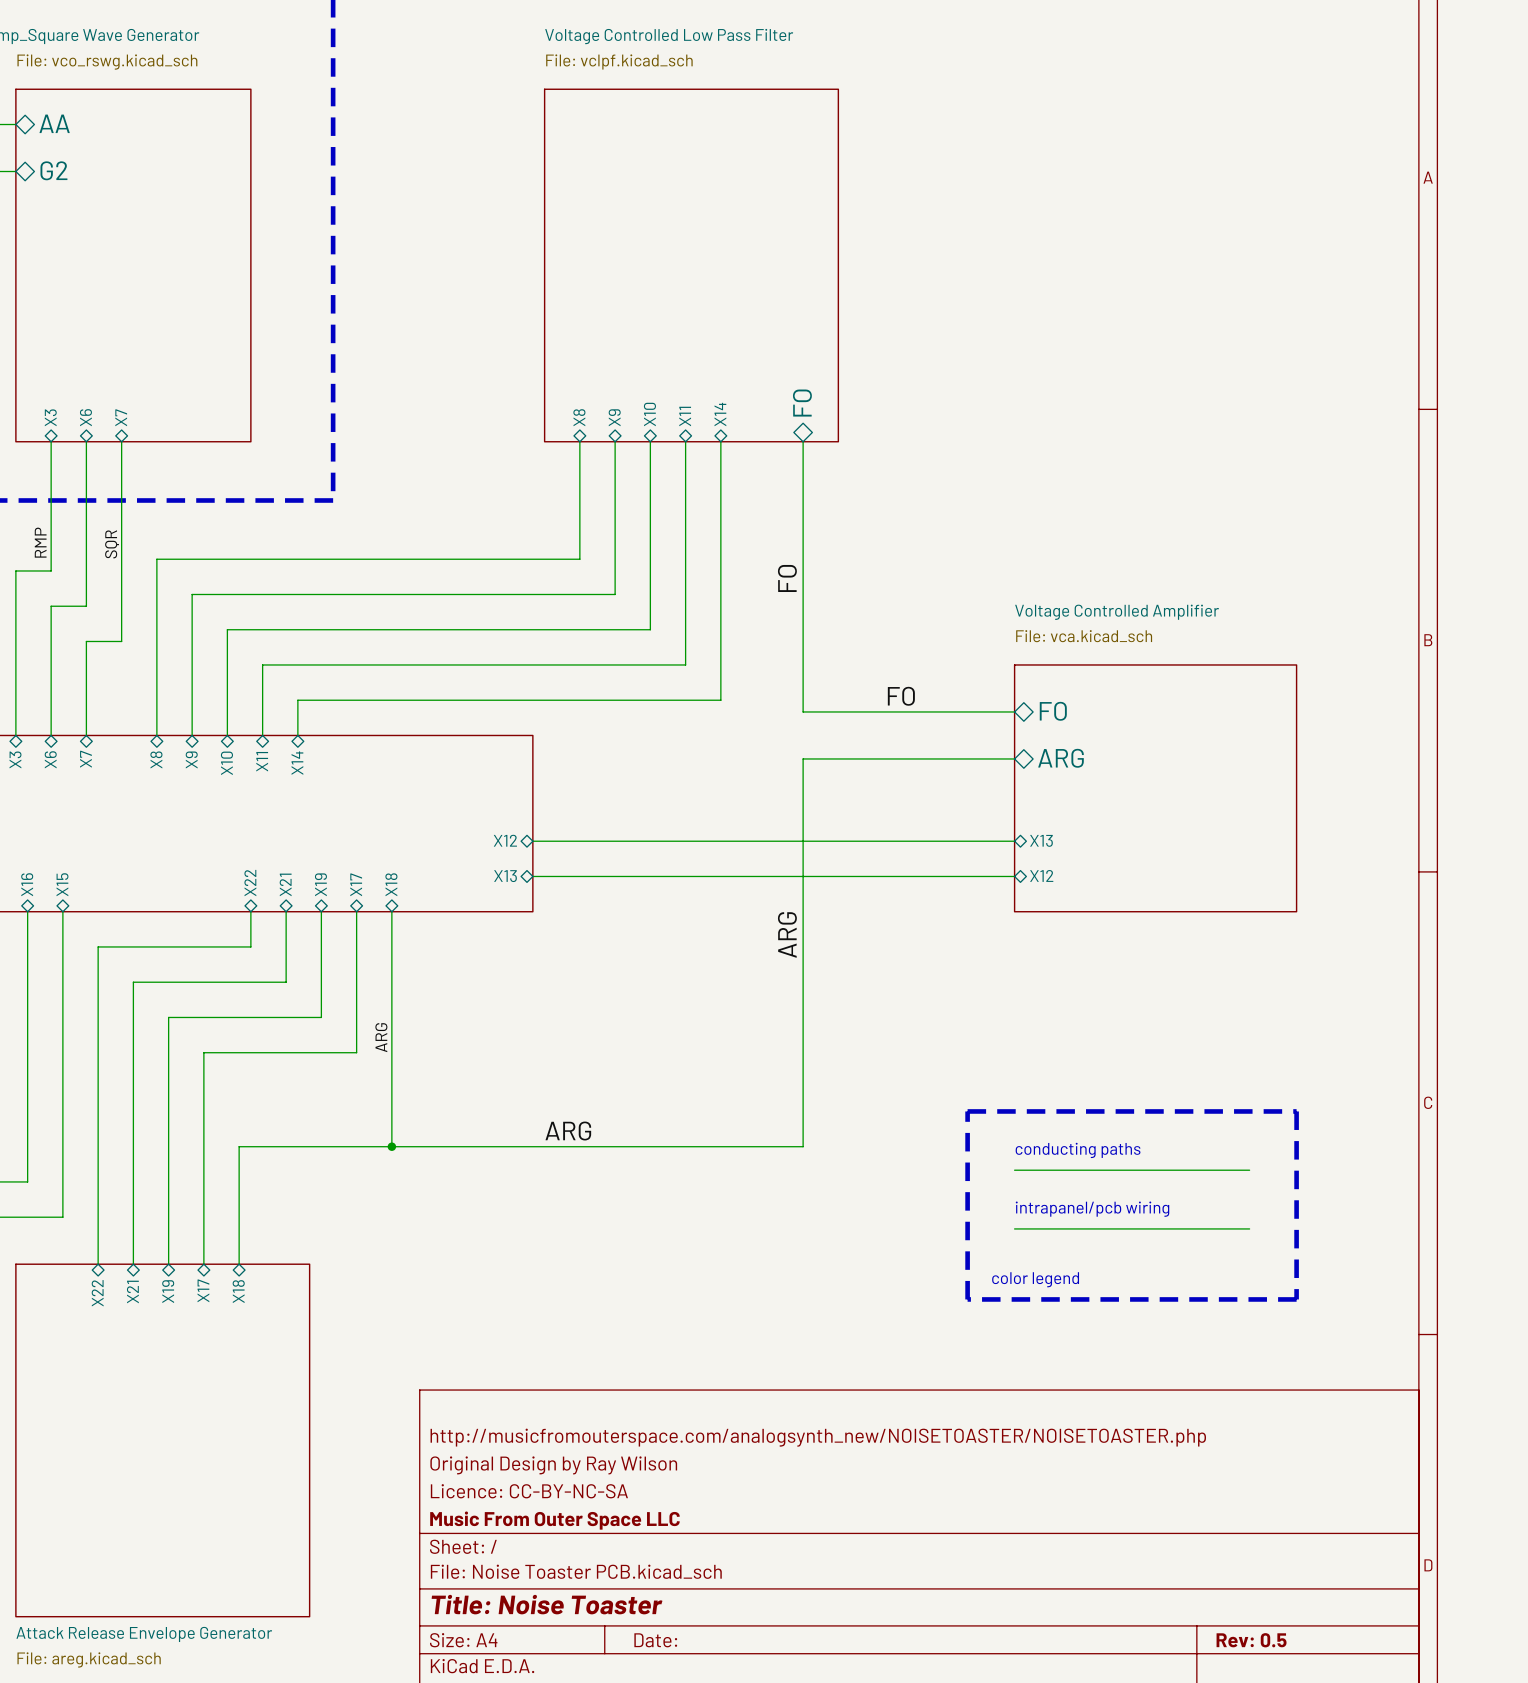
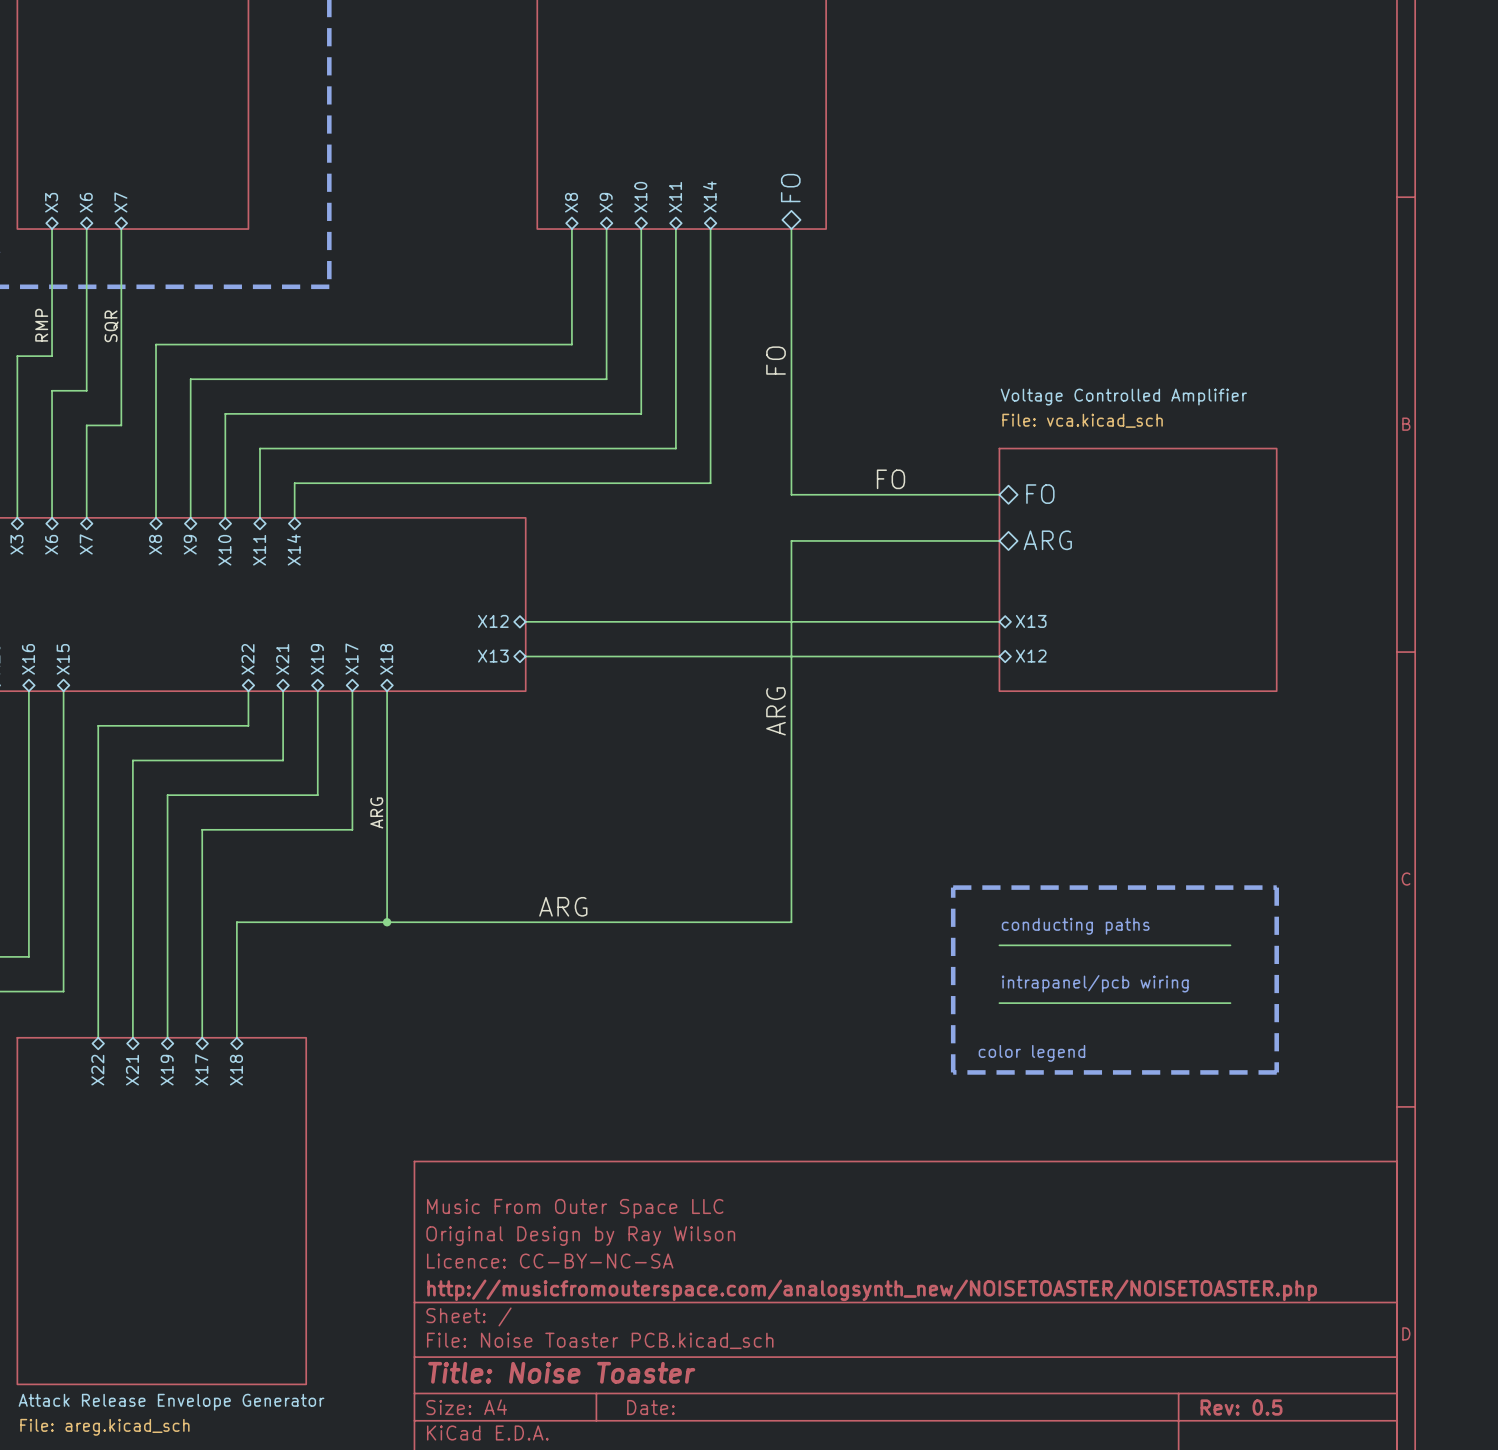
title block: http://musicfromouterspace.com/analogsynth_new/NOISETOASTER/NOISETOASTER.php (818, 1437) -> Music From Outer Space LLC (575, 1208)
title block: Music From Outer Space LLC (554, 1520) -> http://musicfromouterspace.com/analogsynth_new/NOISETOASTER/NOISETOASTER.php (872, 1290)

